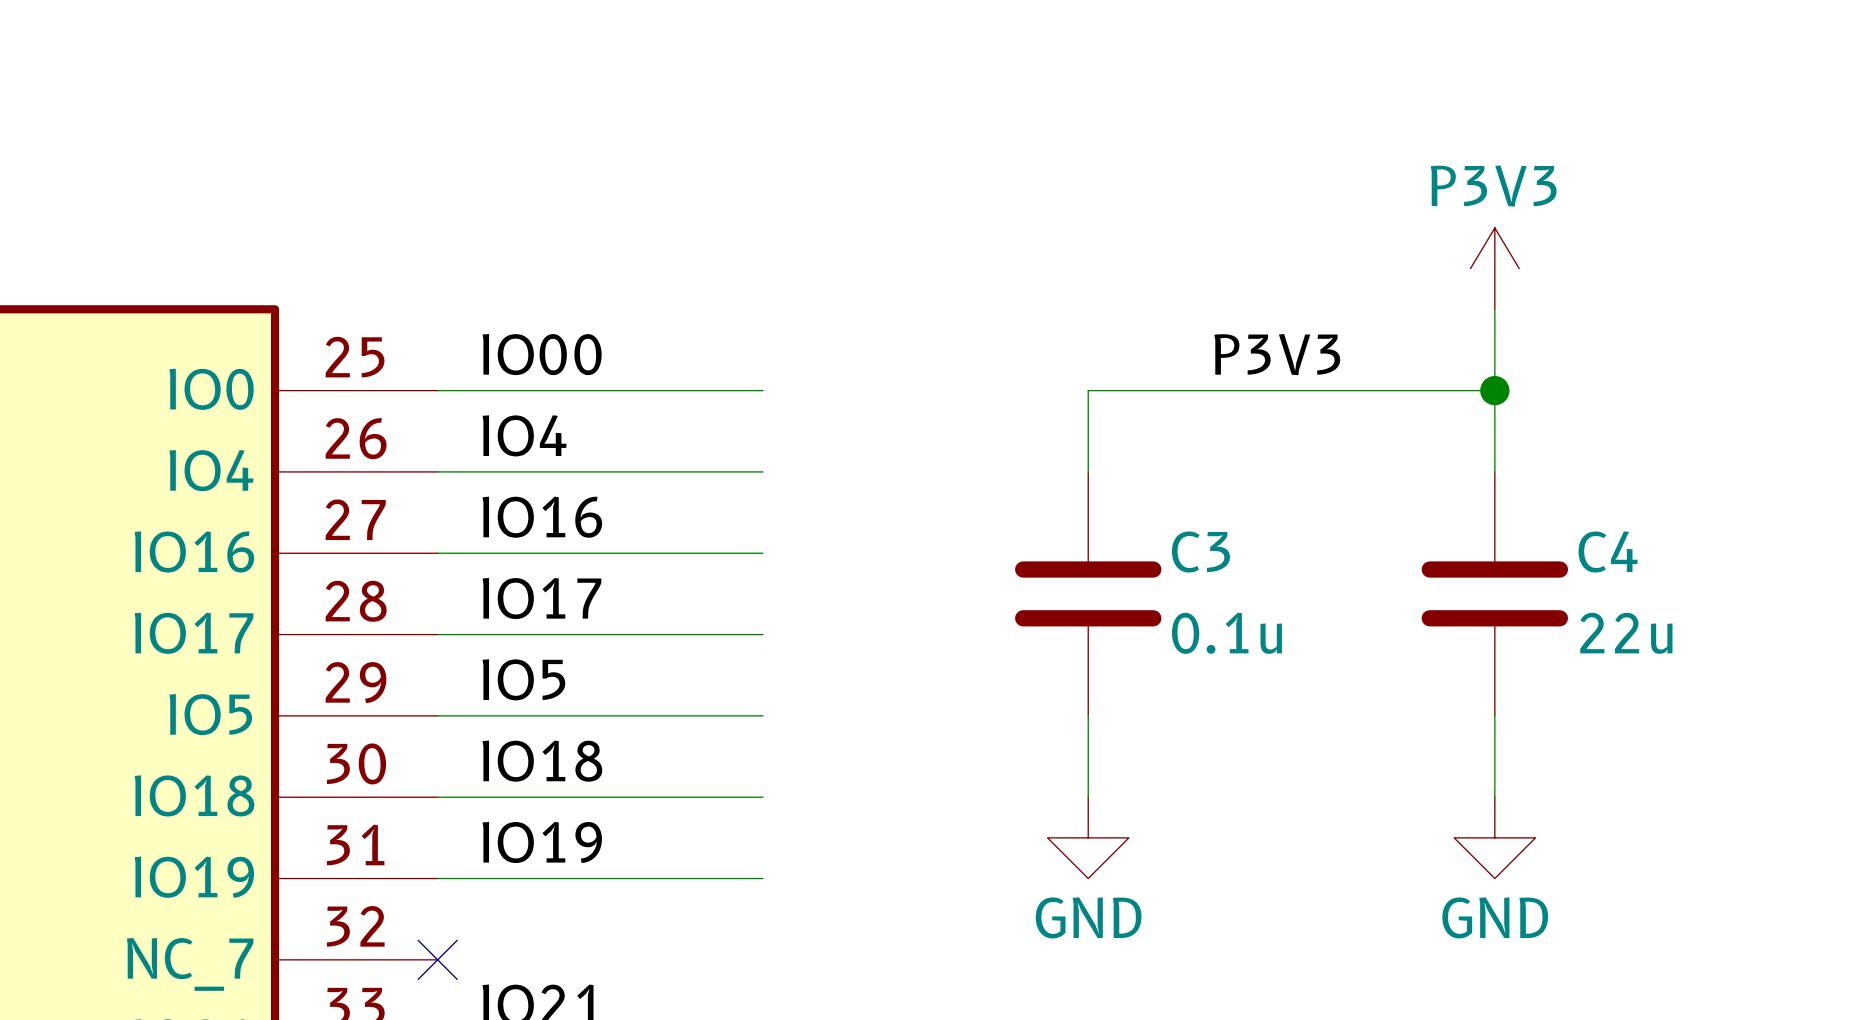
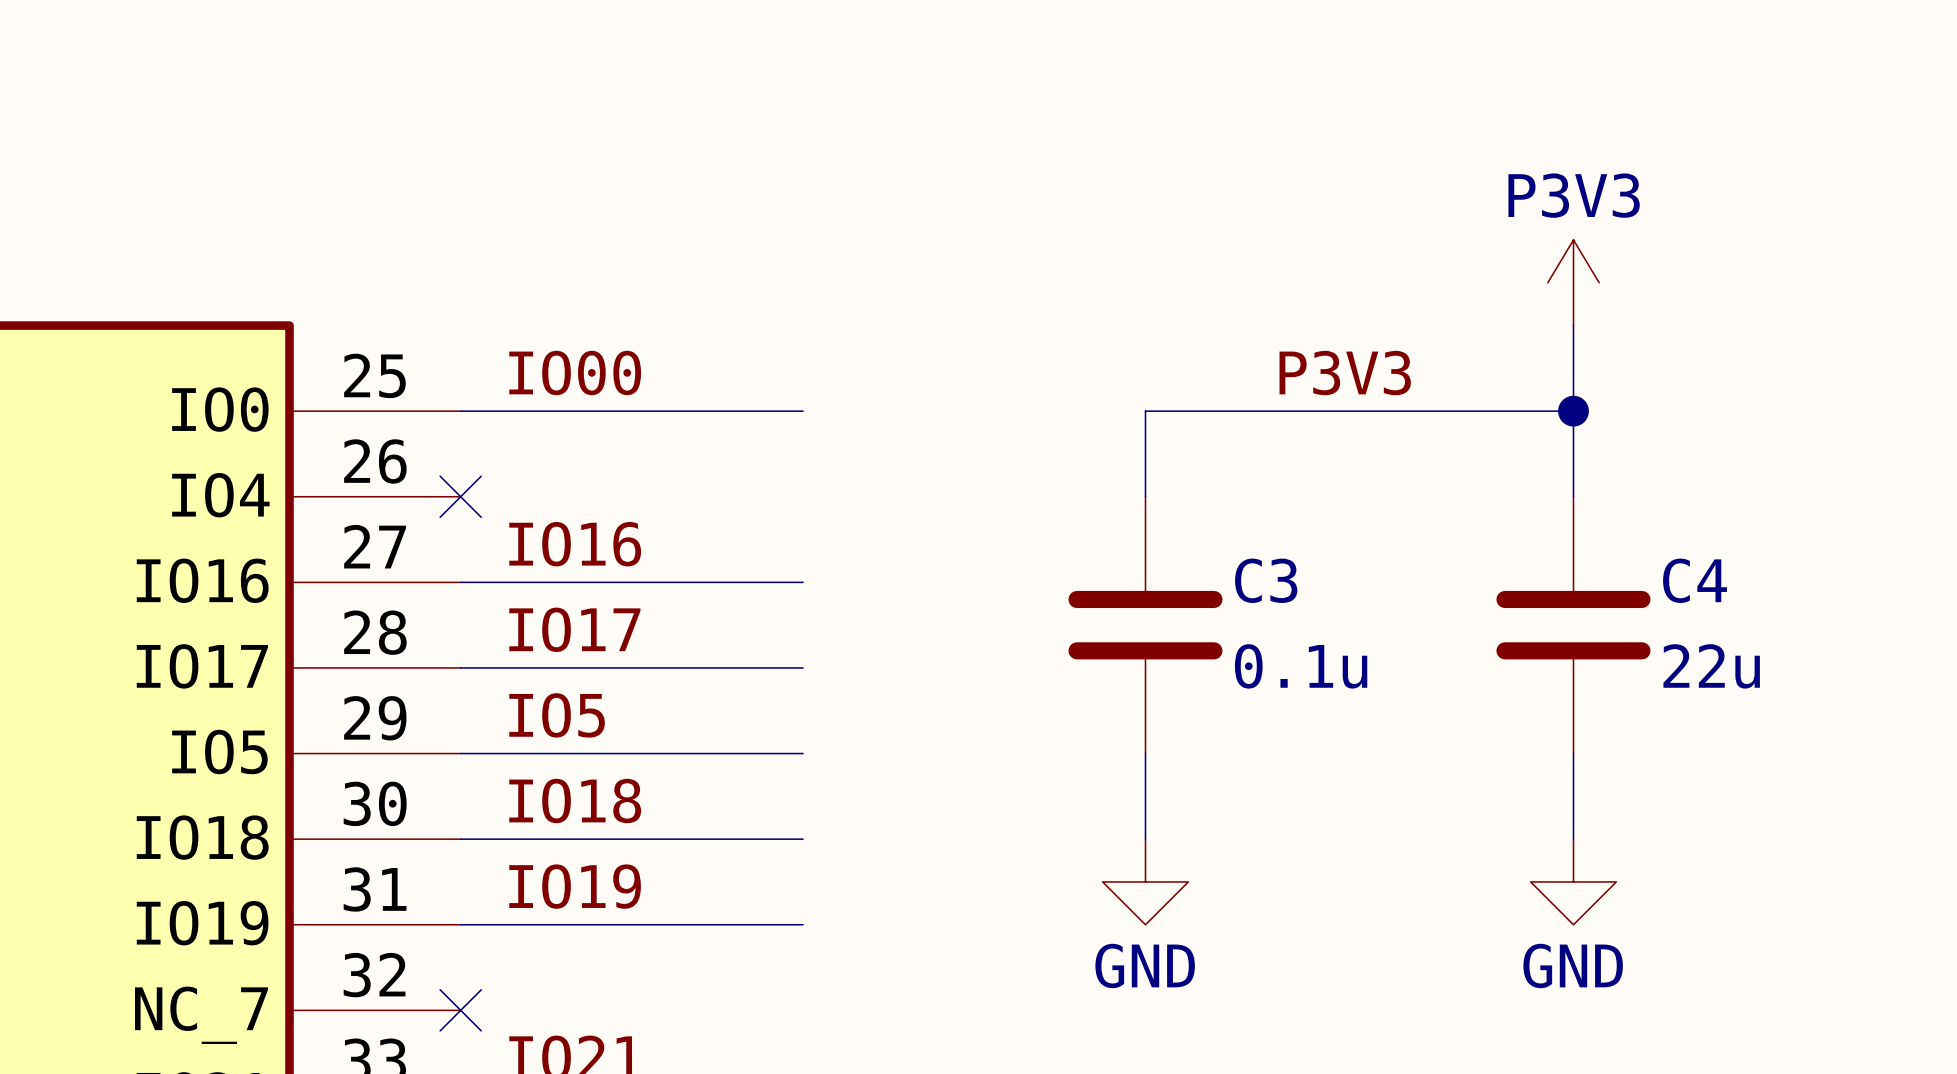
label: IO4 (524, 435) -> none
wire: (437, 471) (762, 471) -> none
no-connect mark: none -> (460, 496)

